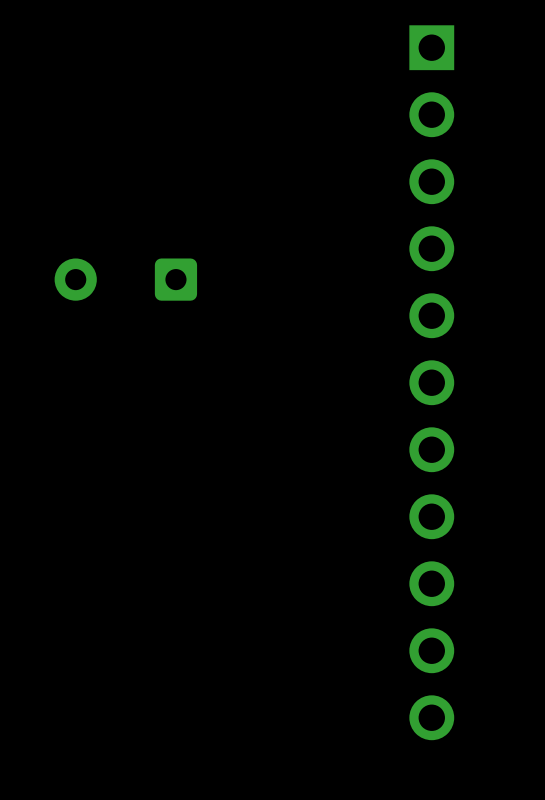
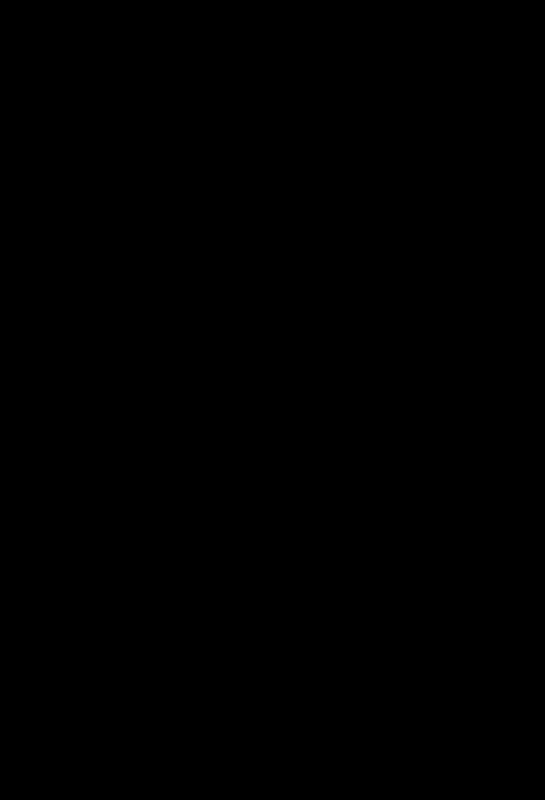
part: (125, 279) -> none
part: (431, 382) -> none

